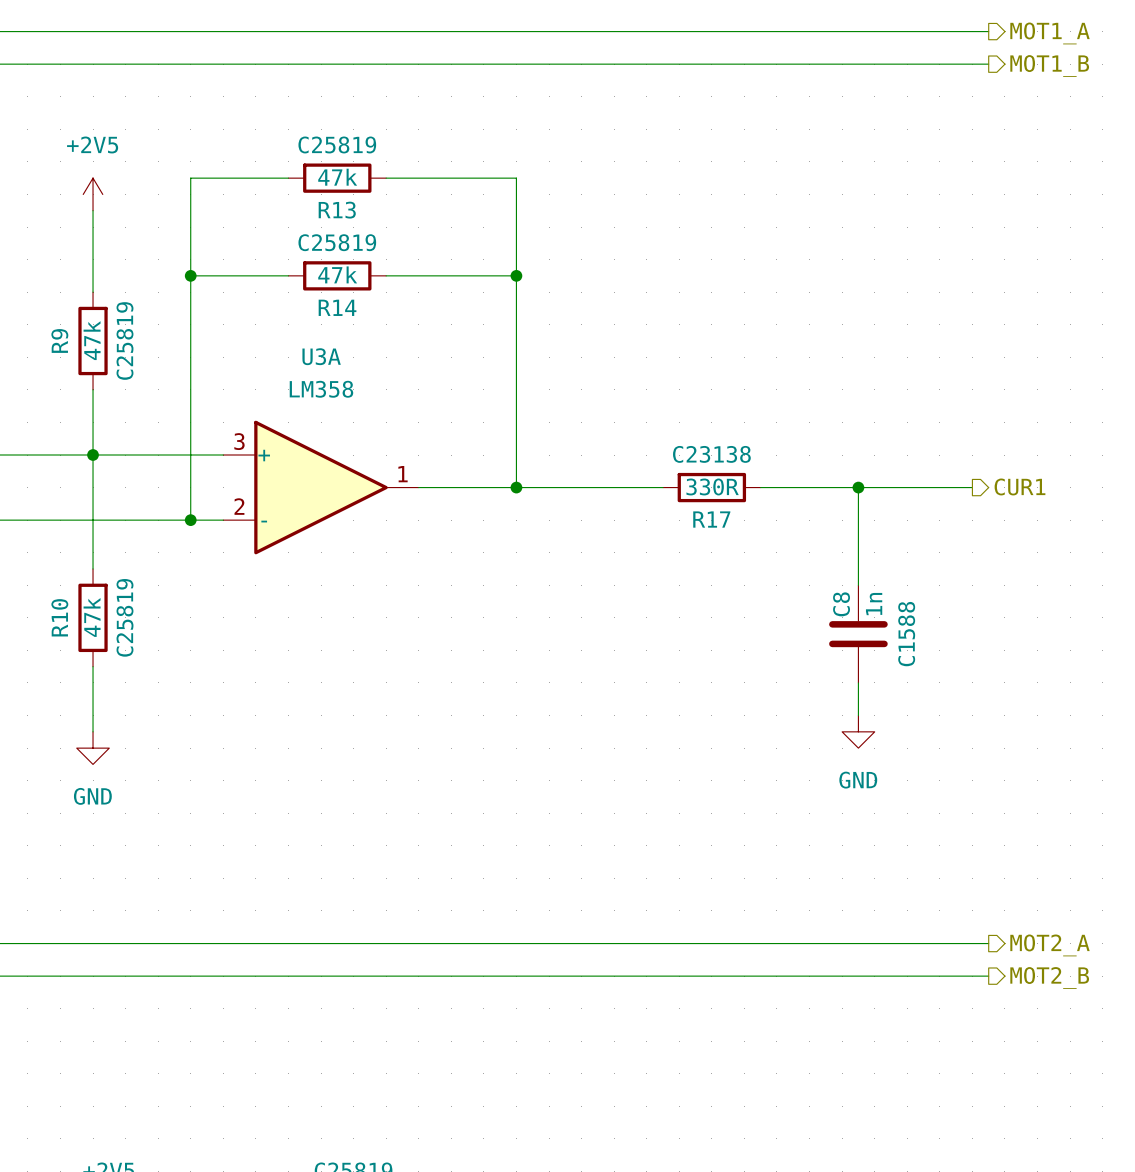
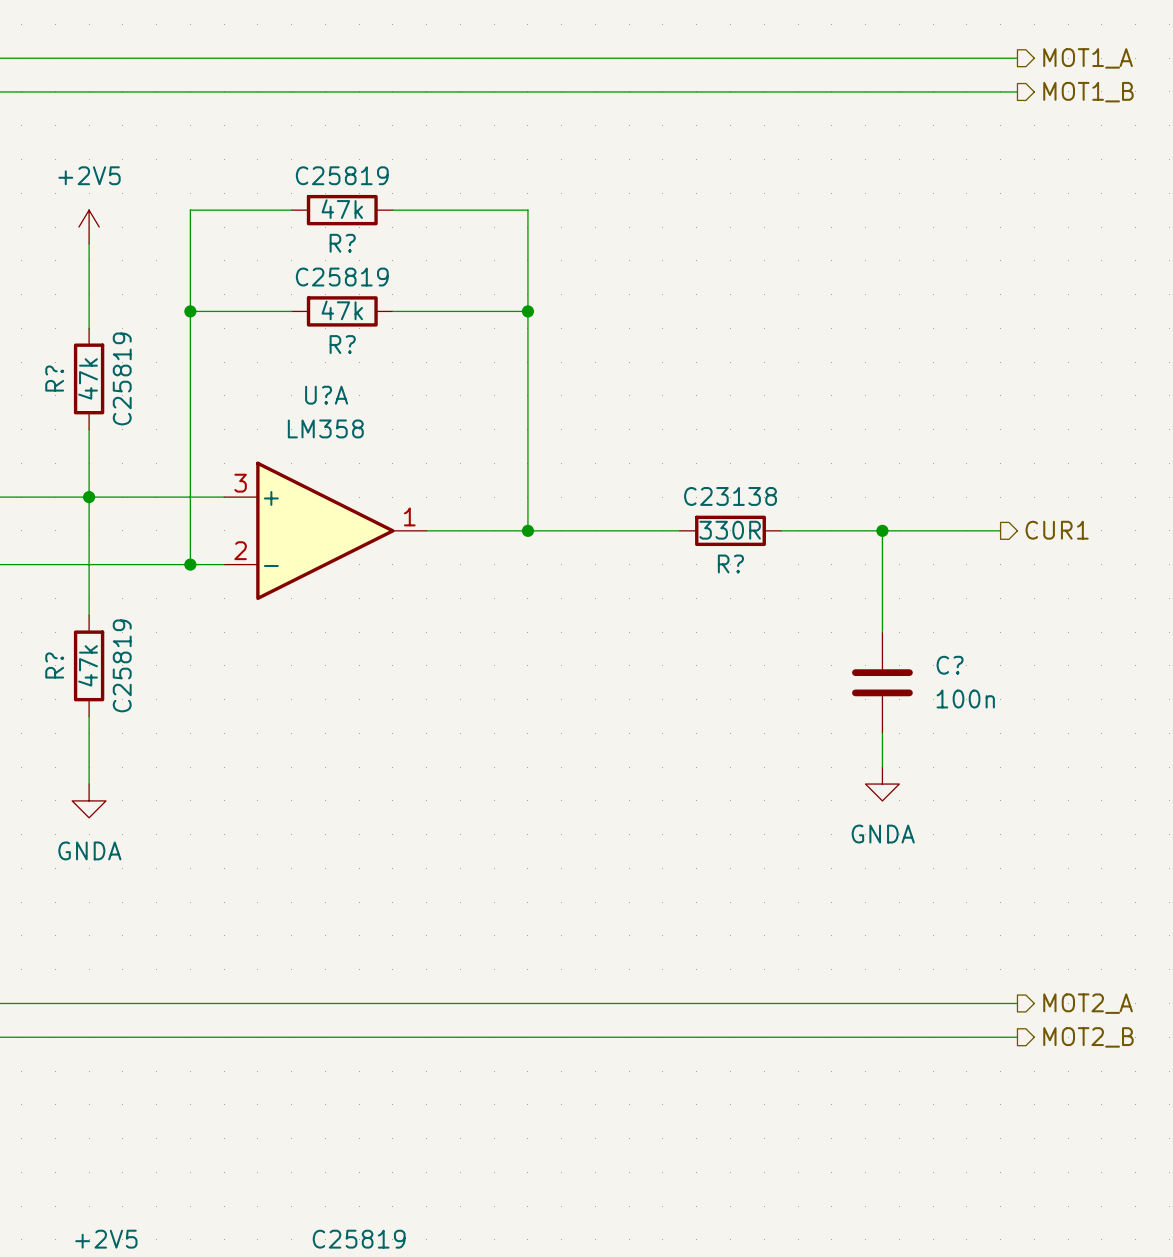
R13 name: R13 (337, 210) -> R? (342, 243)
R14 name: R14 (337, 307) -> R? (342, 344)
R9 name: R9 (59, 340) -> R? (54, 378)
U3A name: U3A (321, 356) -> U?A (326, 395)
R17 name: R17 (711, 519) -> R? (730, 563)
C8 name: C8 (841, 604) -> C? (950, 665)
C8 value: 1n (874, 604) -> 100n (965, 699)
R10 name: R10 (59, 617) -> R? (54, 665)
C8 text: C1588 (906, 634) -> none
power symbol: GND (858, 731) -> GNDA (882, 784)
power symbol: GND (93, 748) -> GNDA (89, 800)

